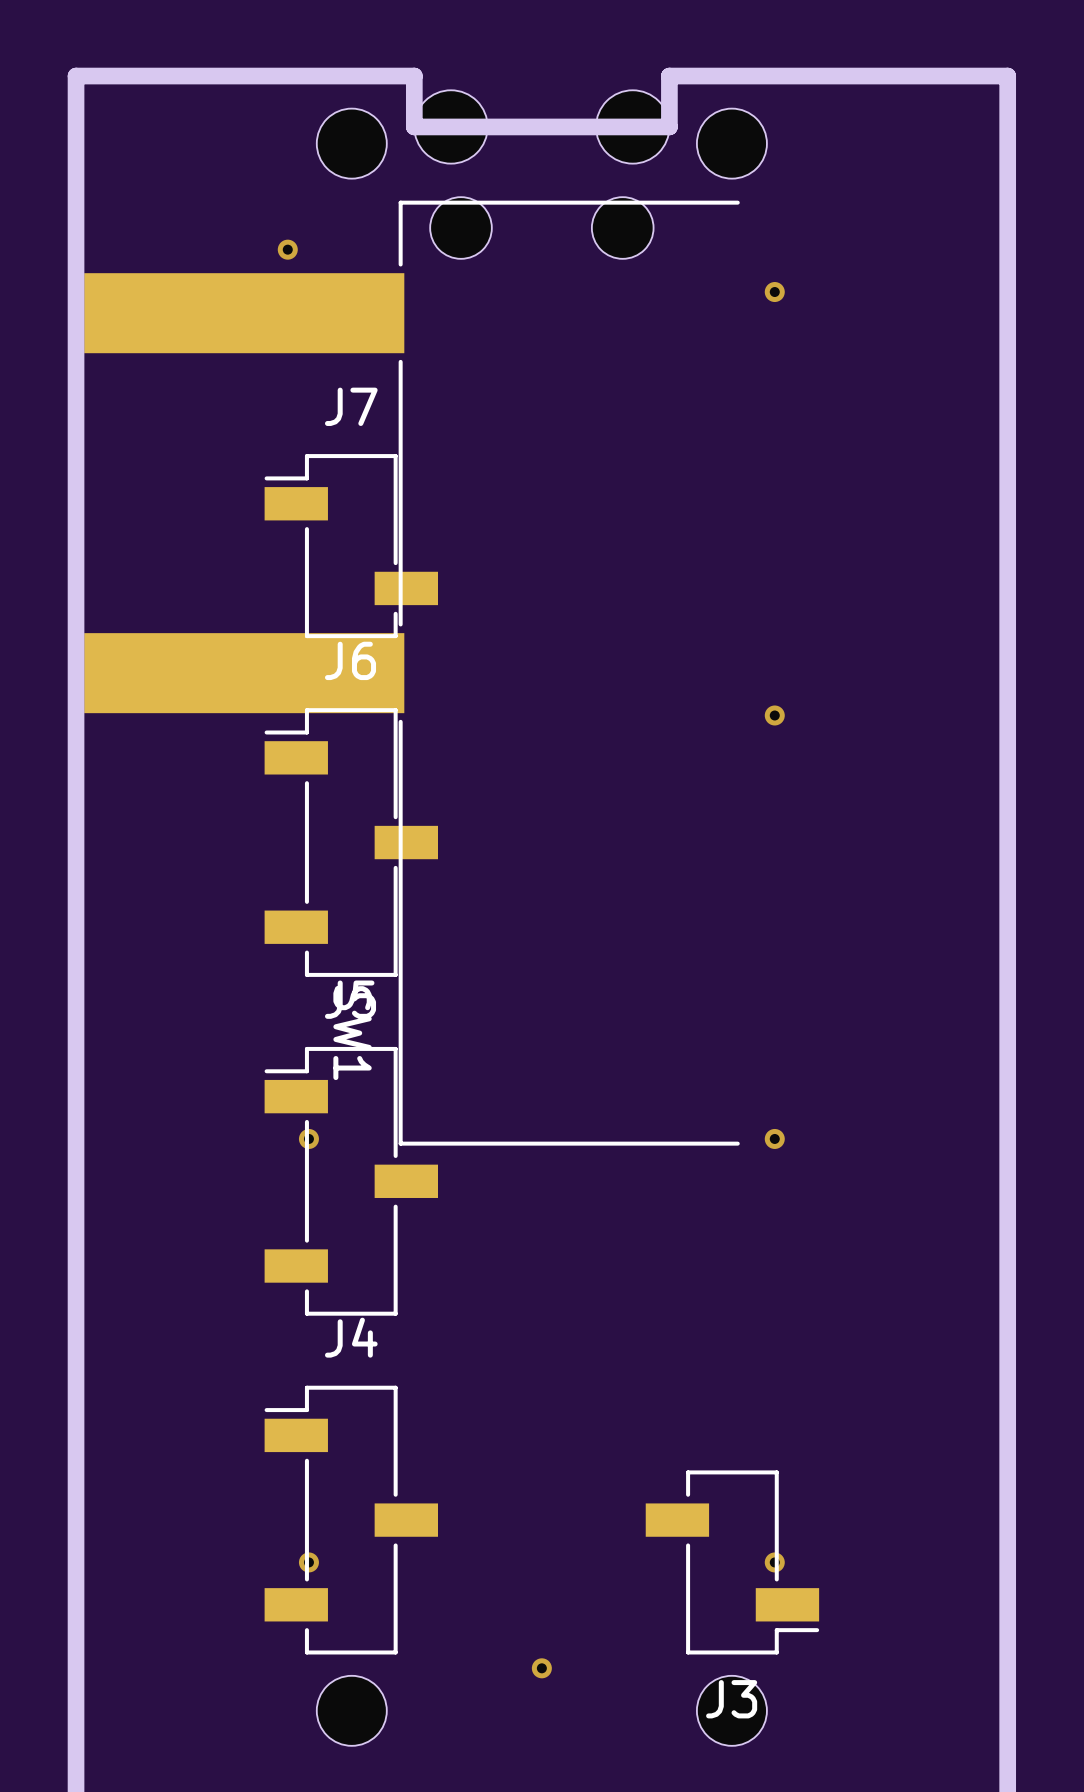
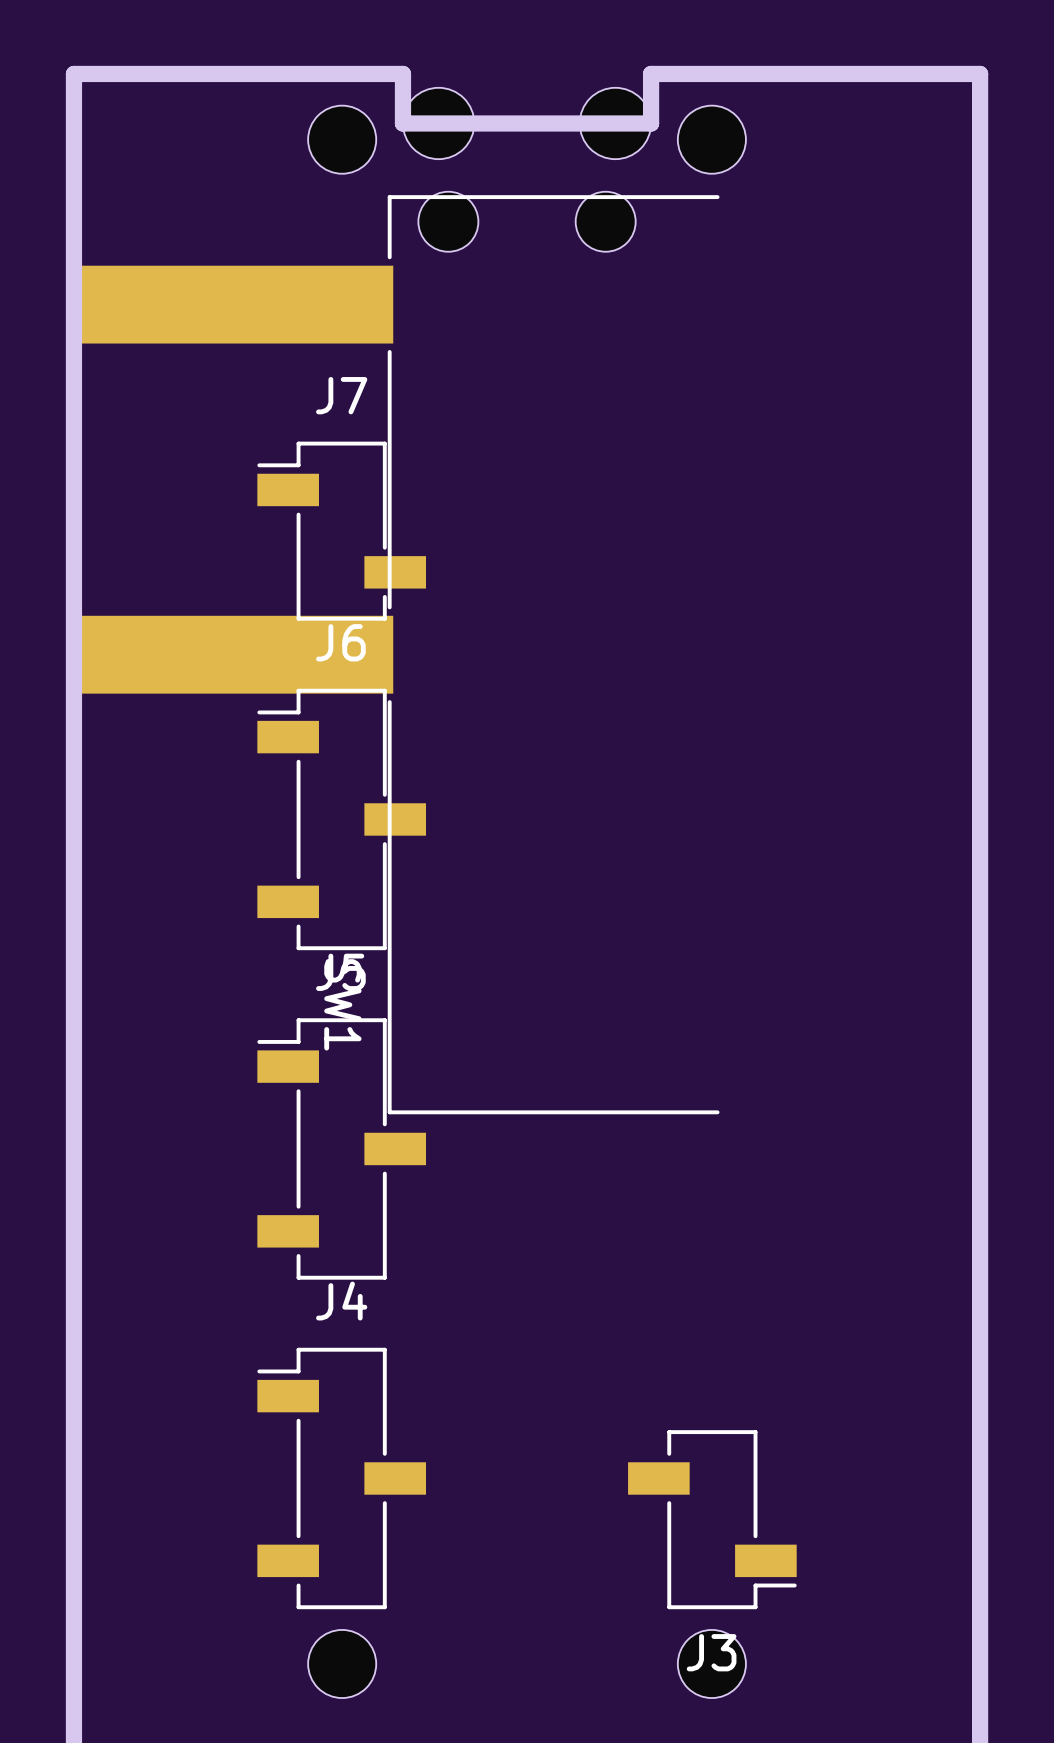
via: (287, 249) -> none
via: (774, 292) -> none
via: (774, 715) -> none
via: (308, 1138) -> none
via: (774, 1138) -> none
via: (308, 1562) -> none
via: (774, 1562) -> none
via: (541, 1668) -> none

